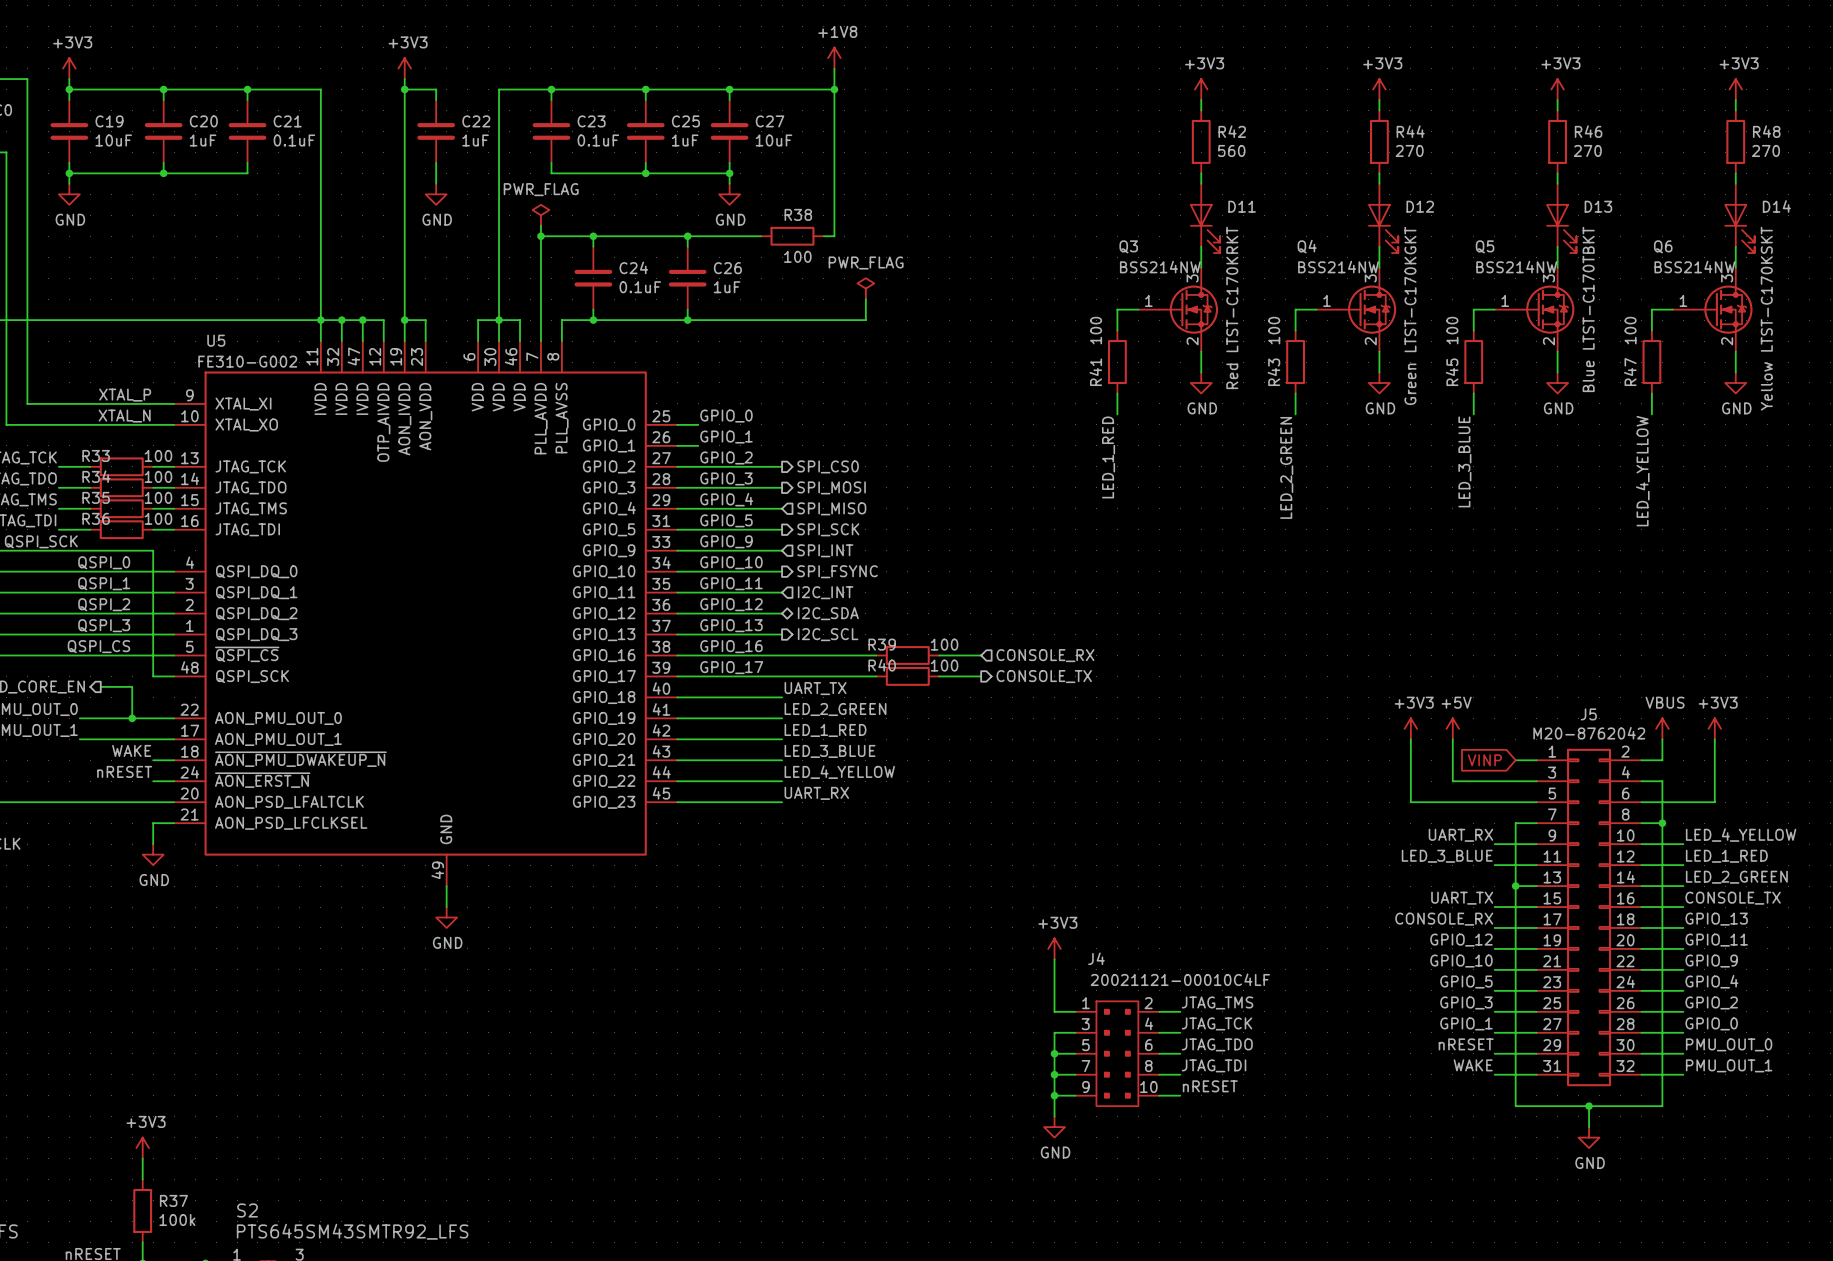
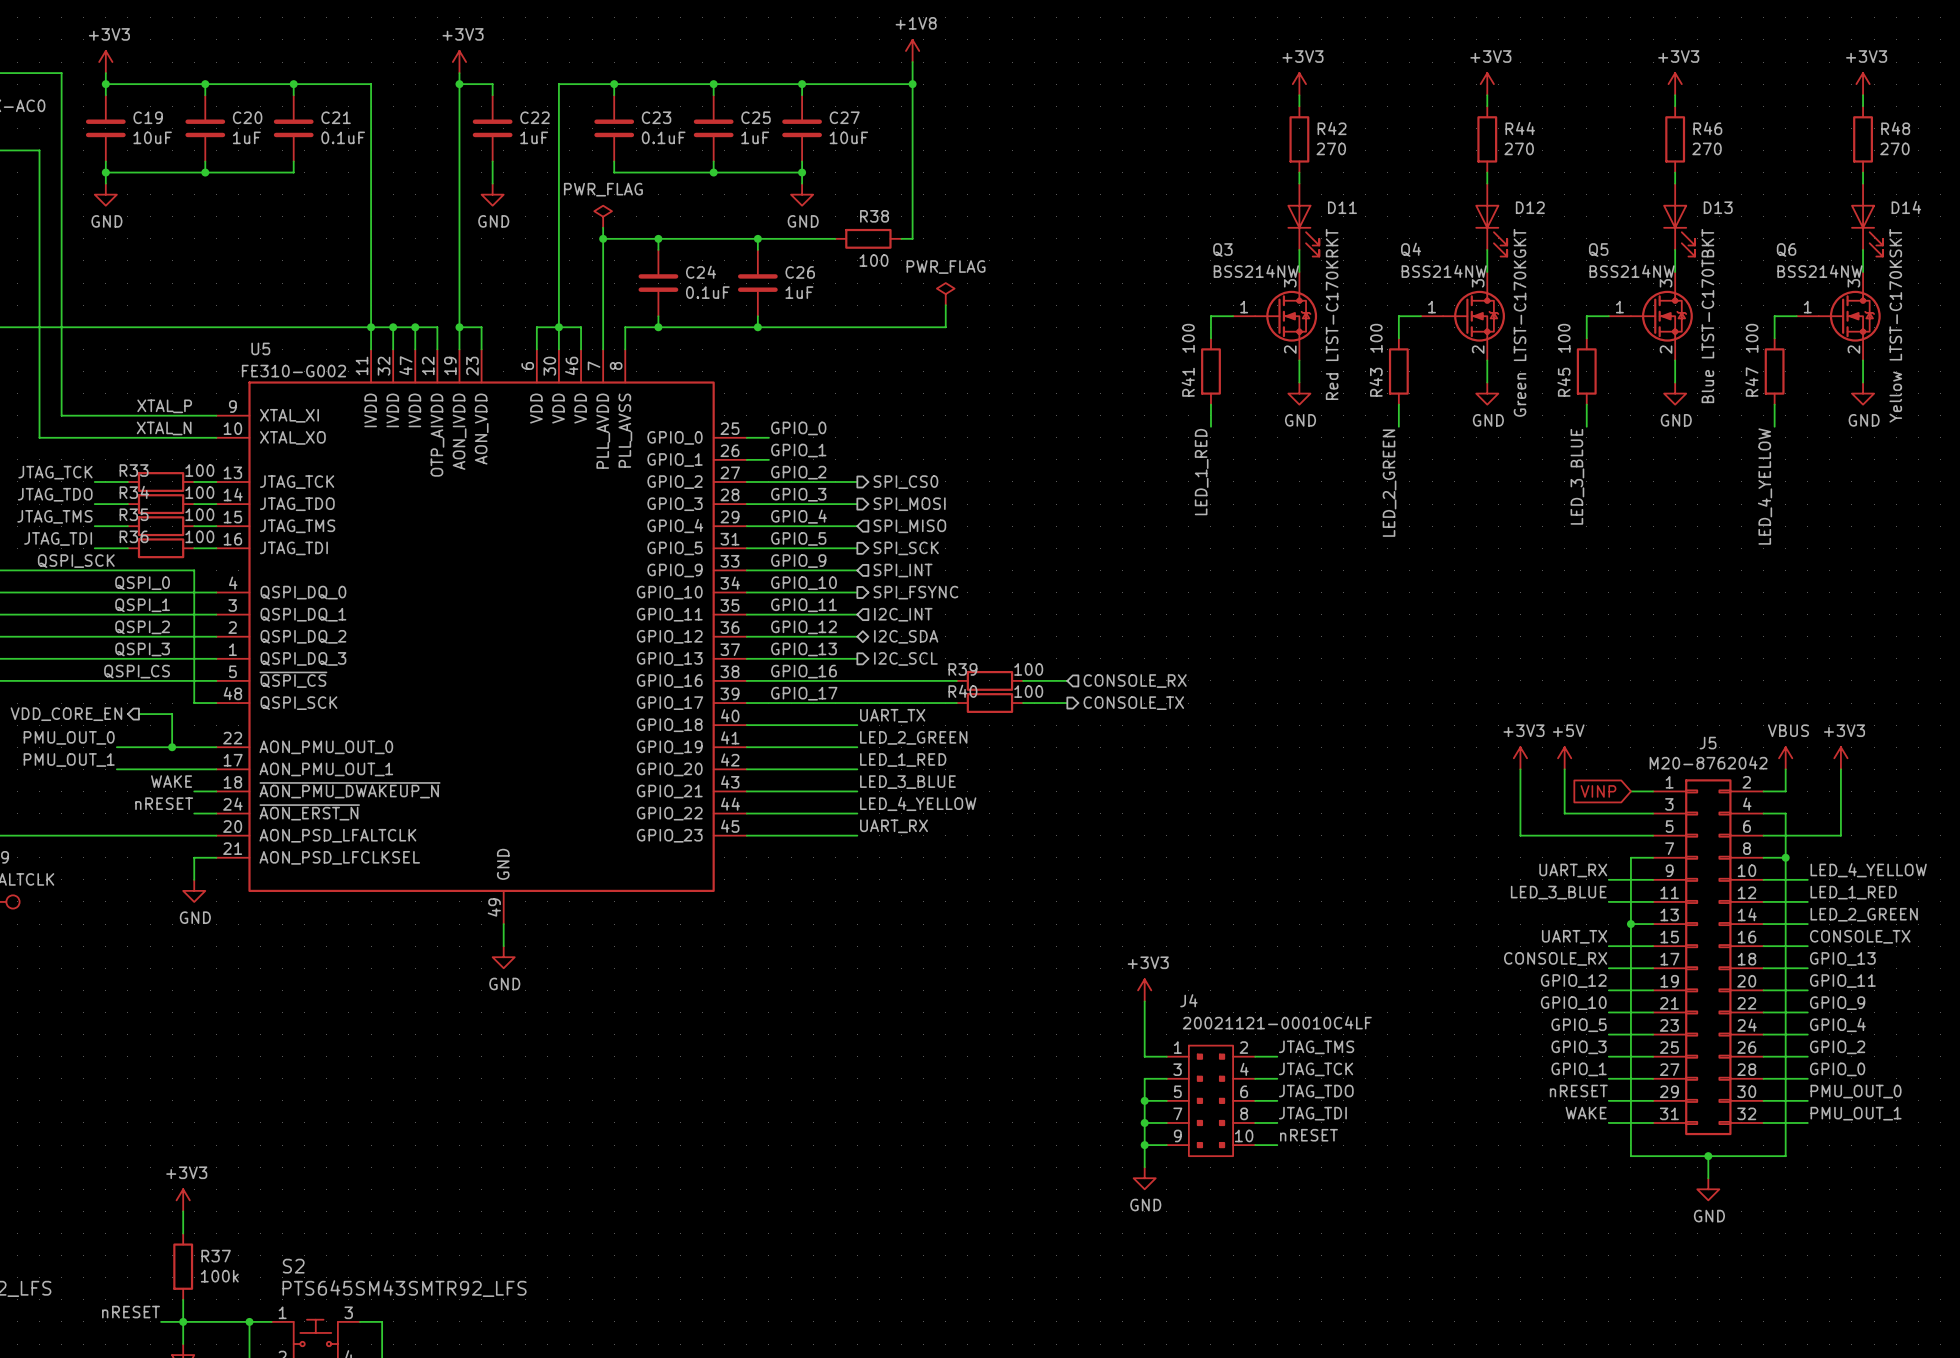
R42 value: 560 (1231, 150) -> 270 (1331, 148)

